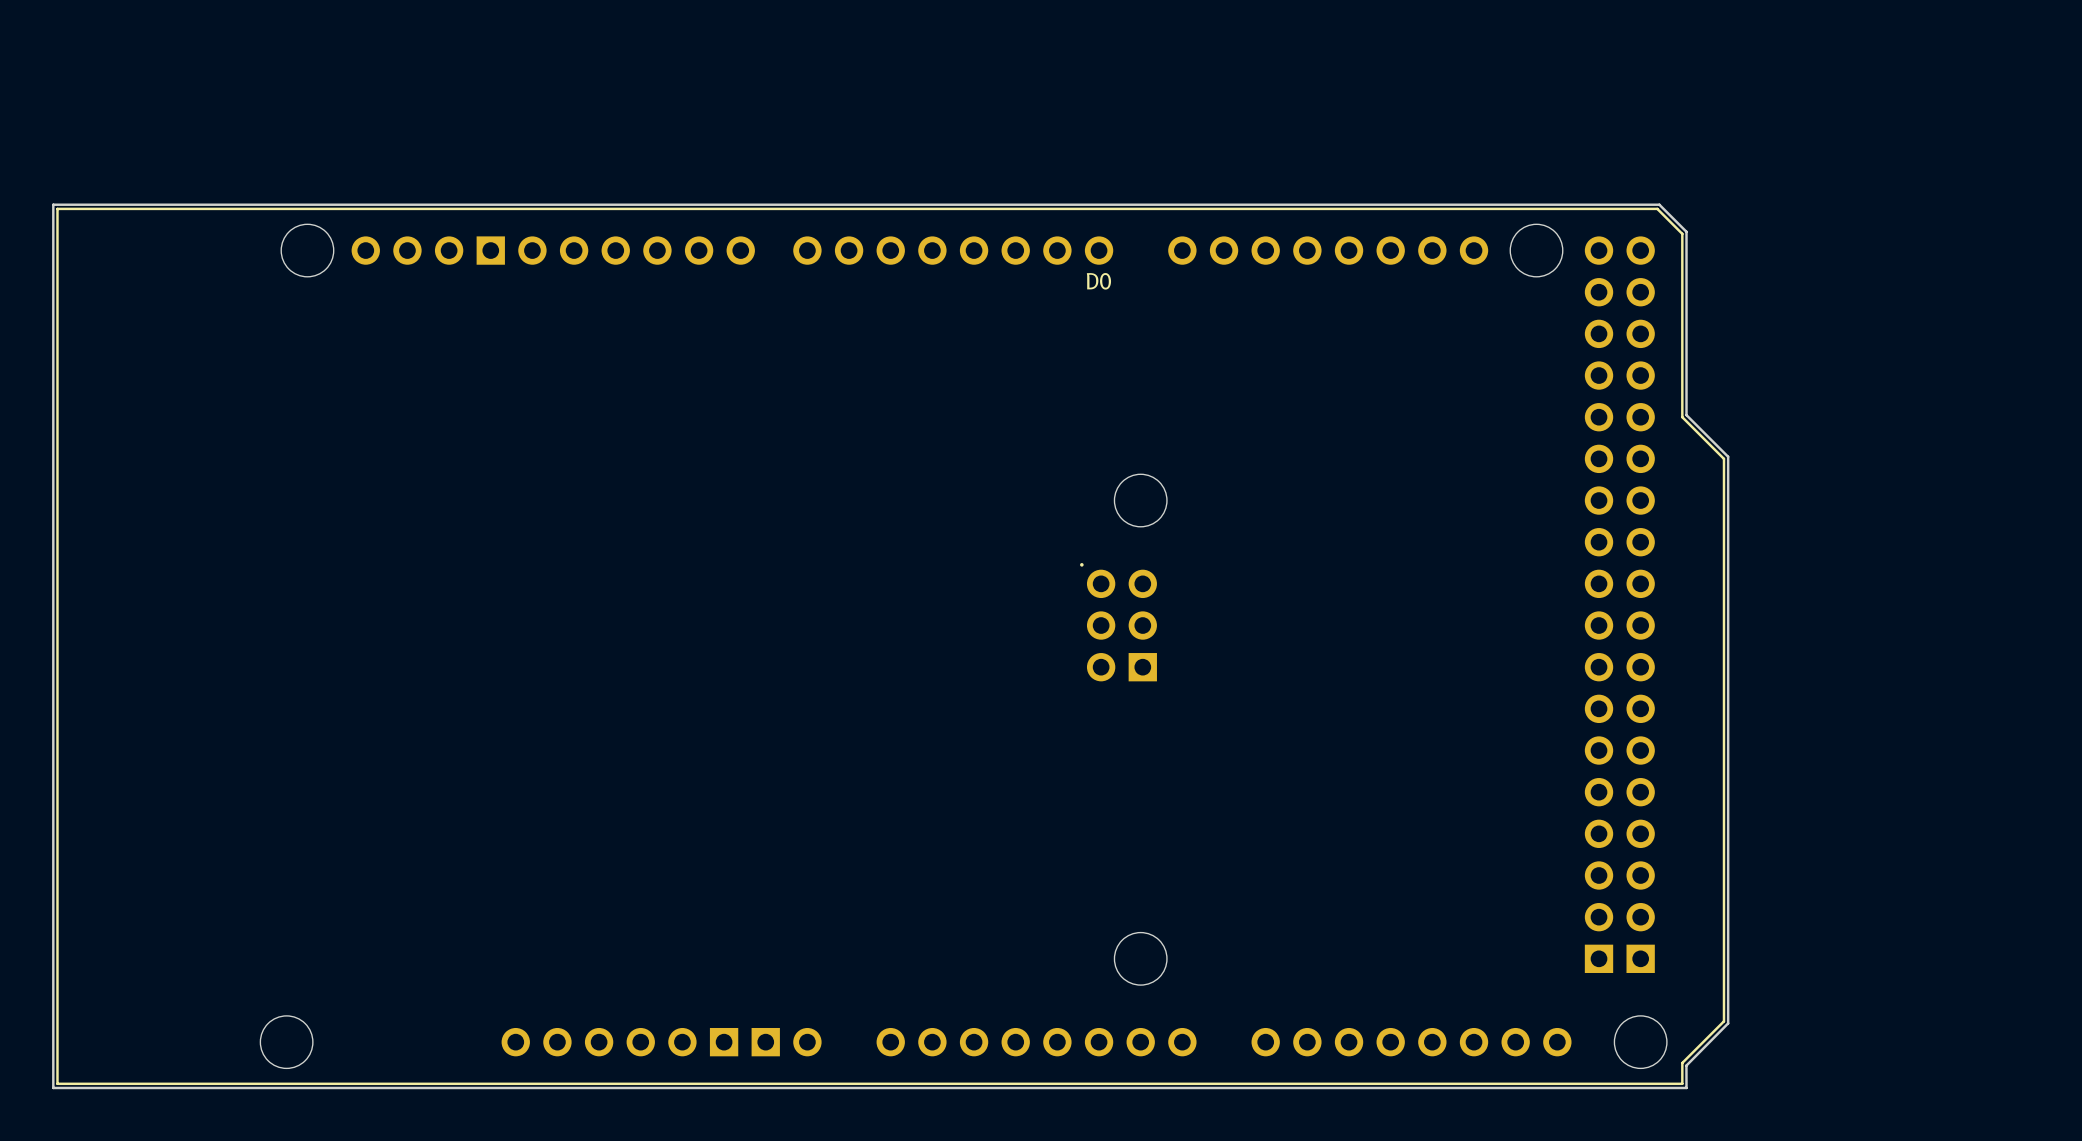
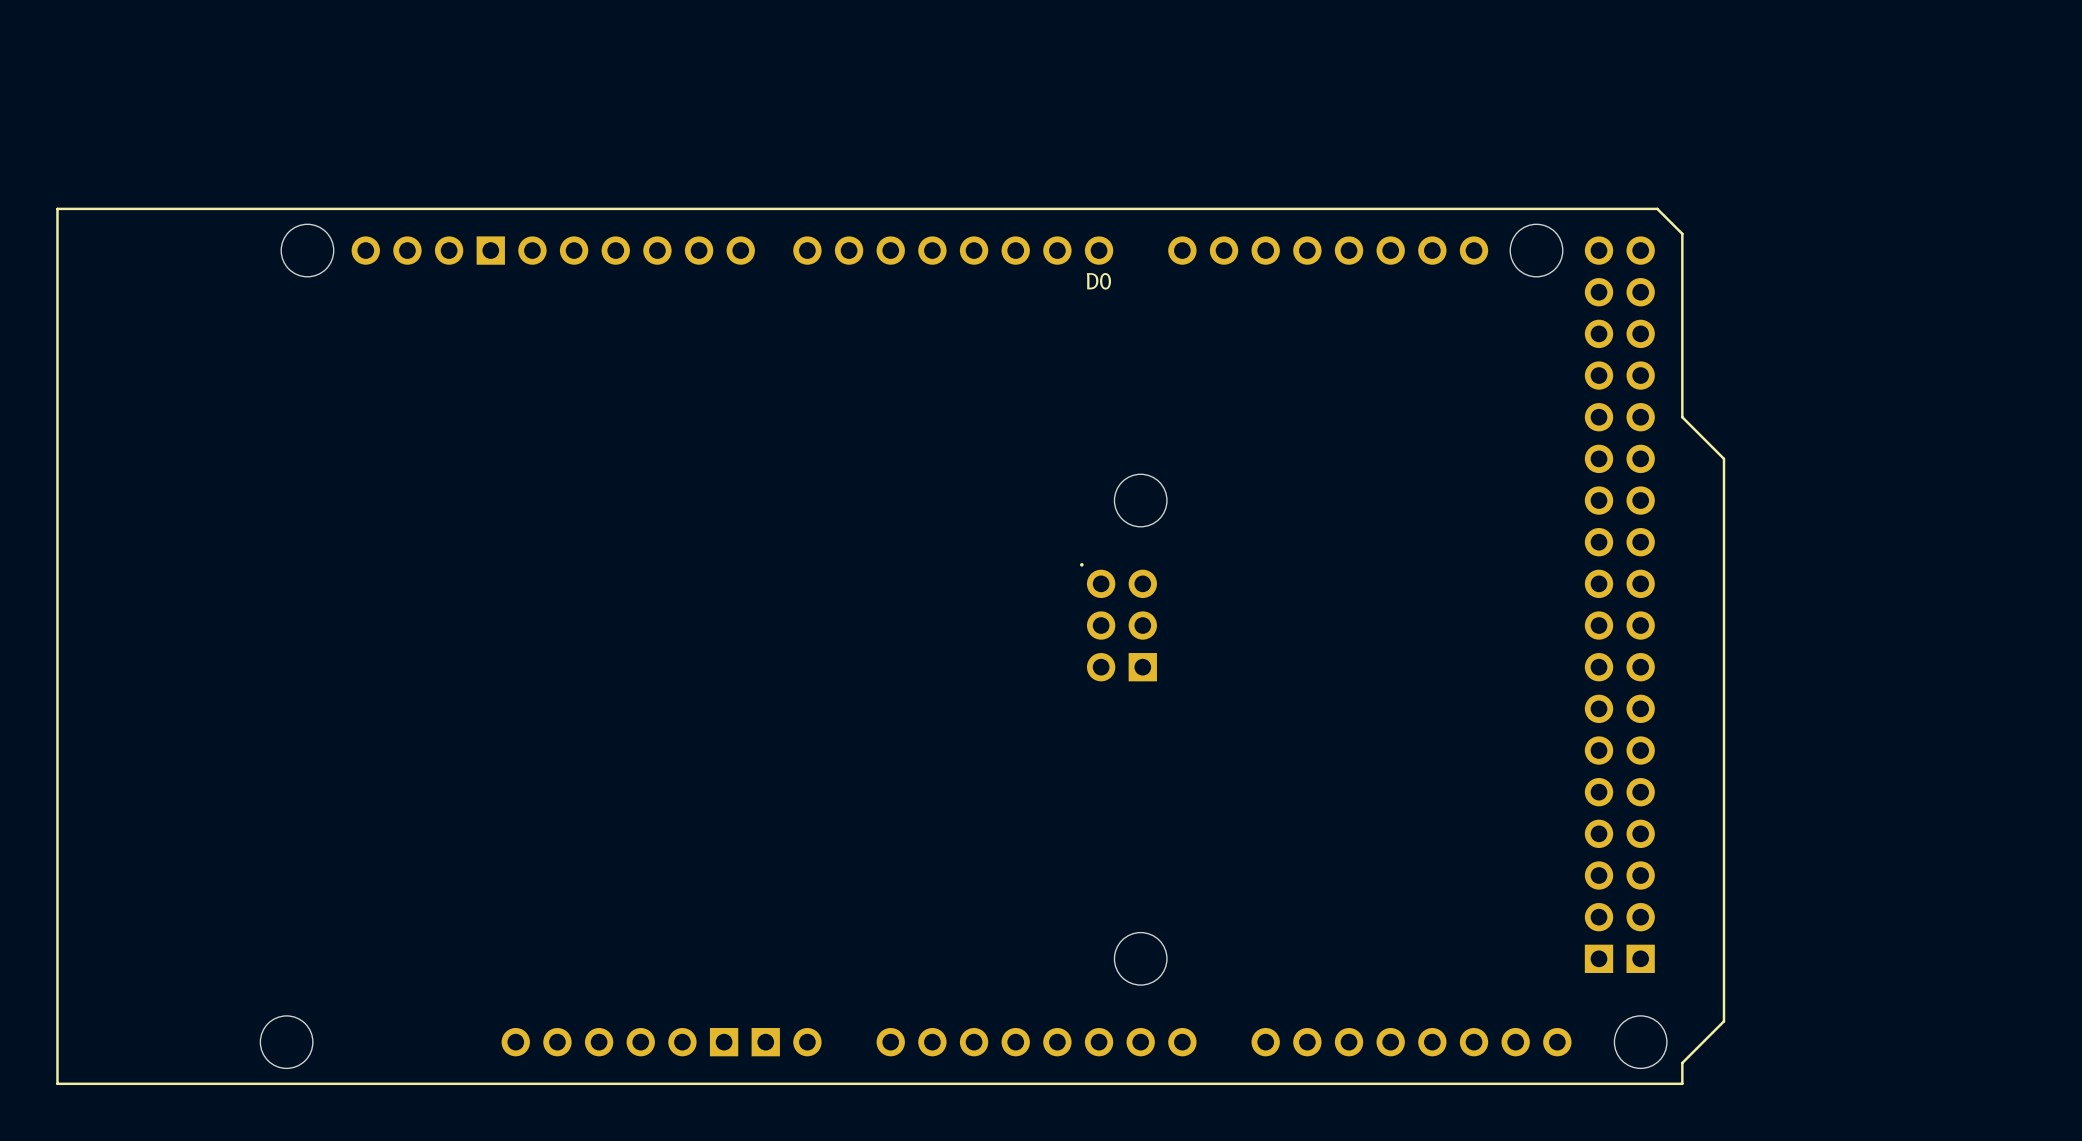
drawing: [52, 203, 1730, 1090] -> none

